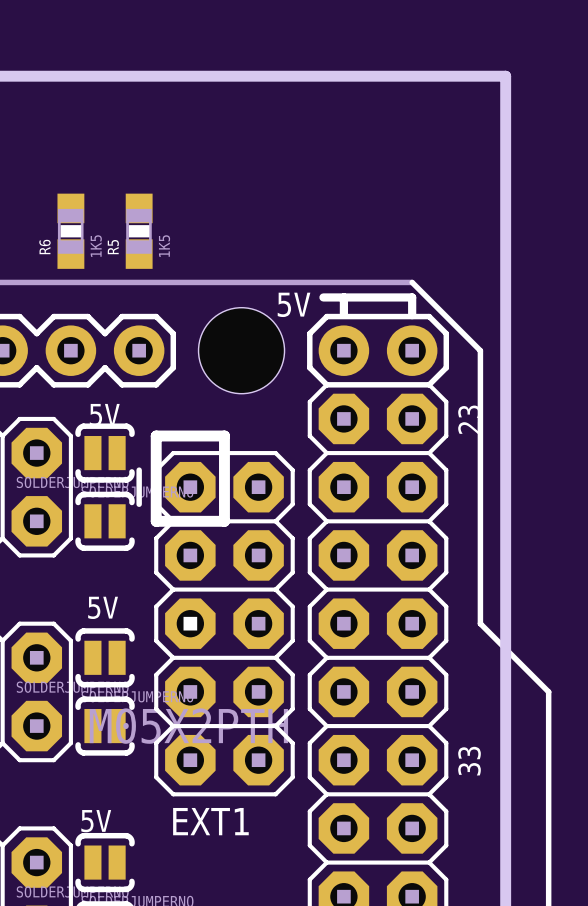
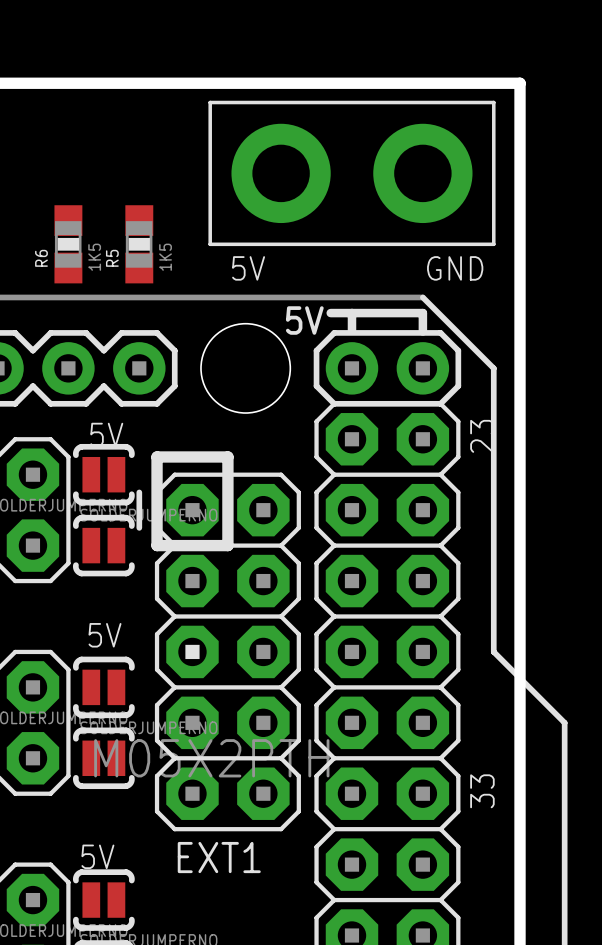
part: none -> (351, 173)
text: none -> 5V (248, 268)
text: none -> GND (455, 268)

